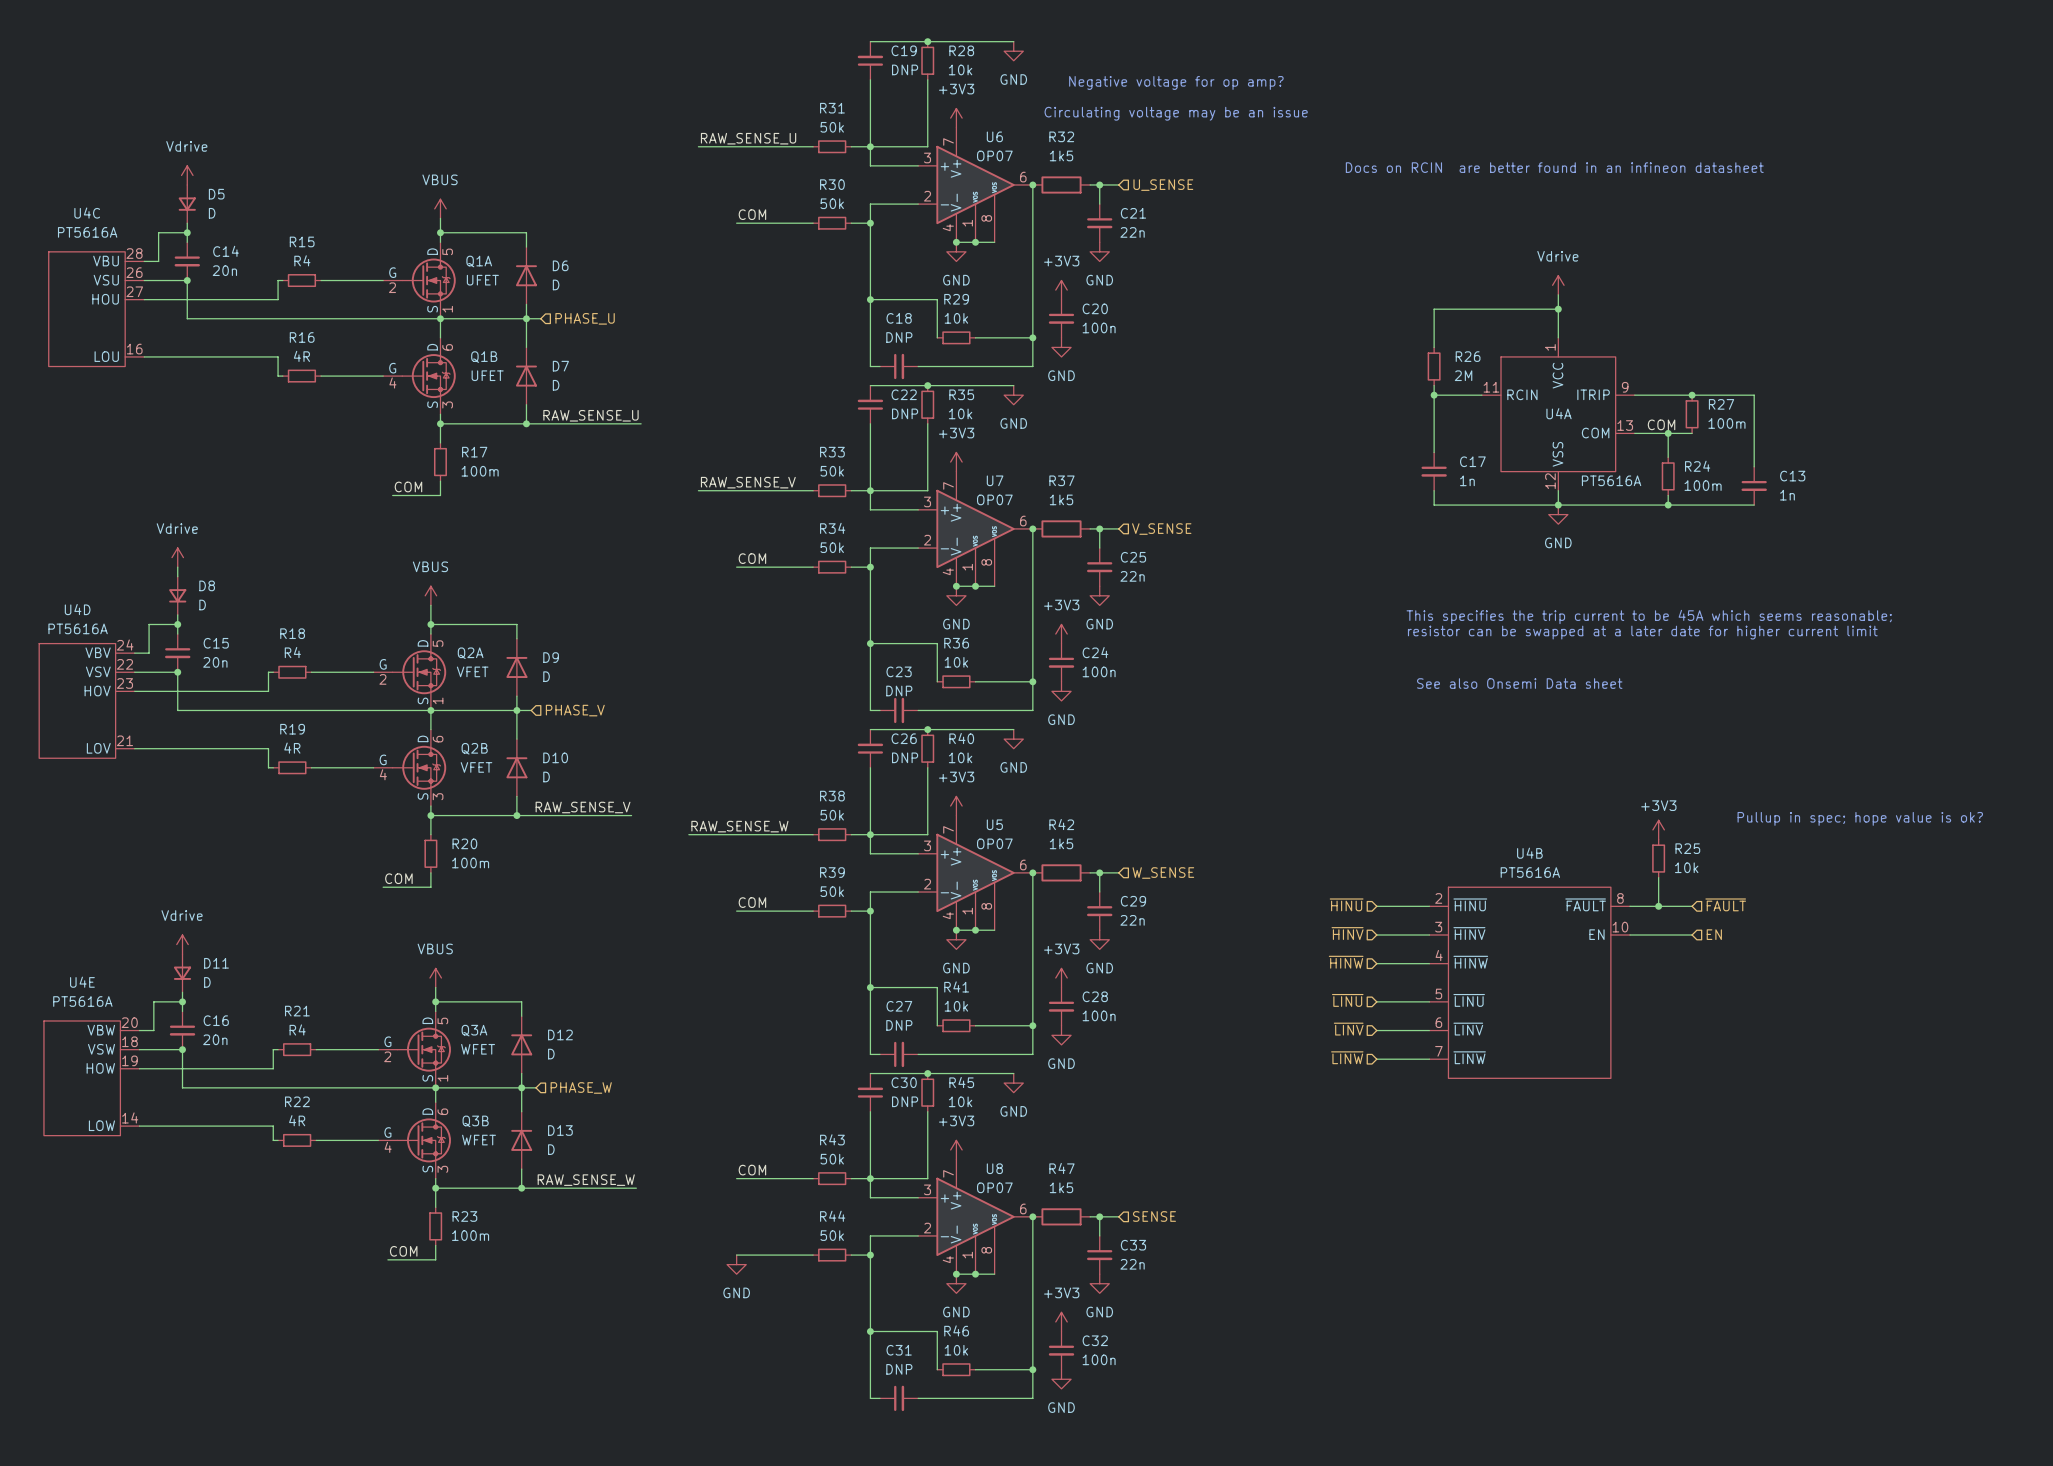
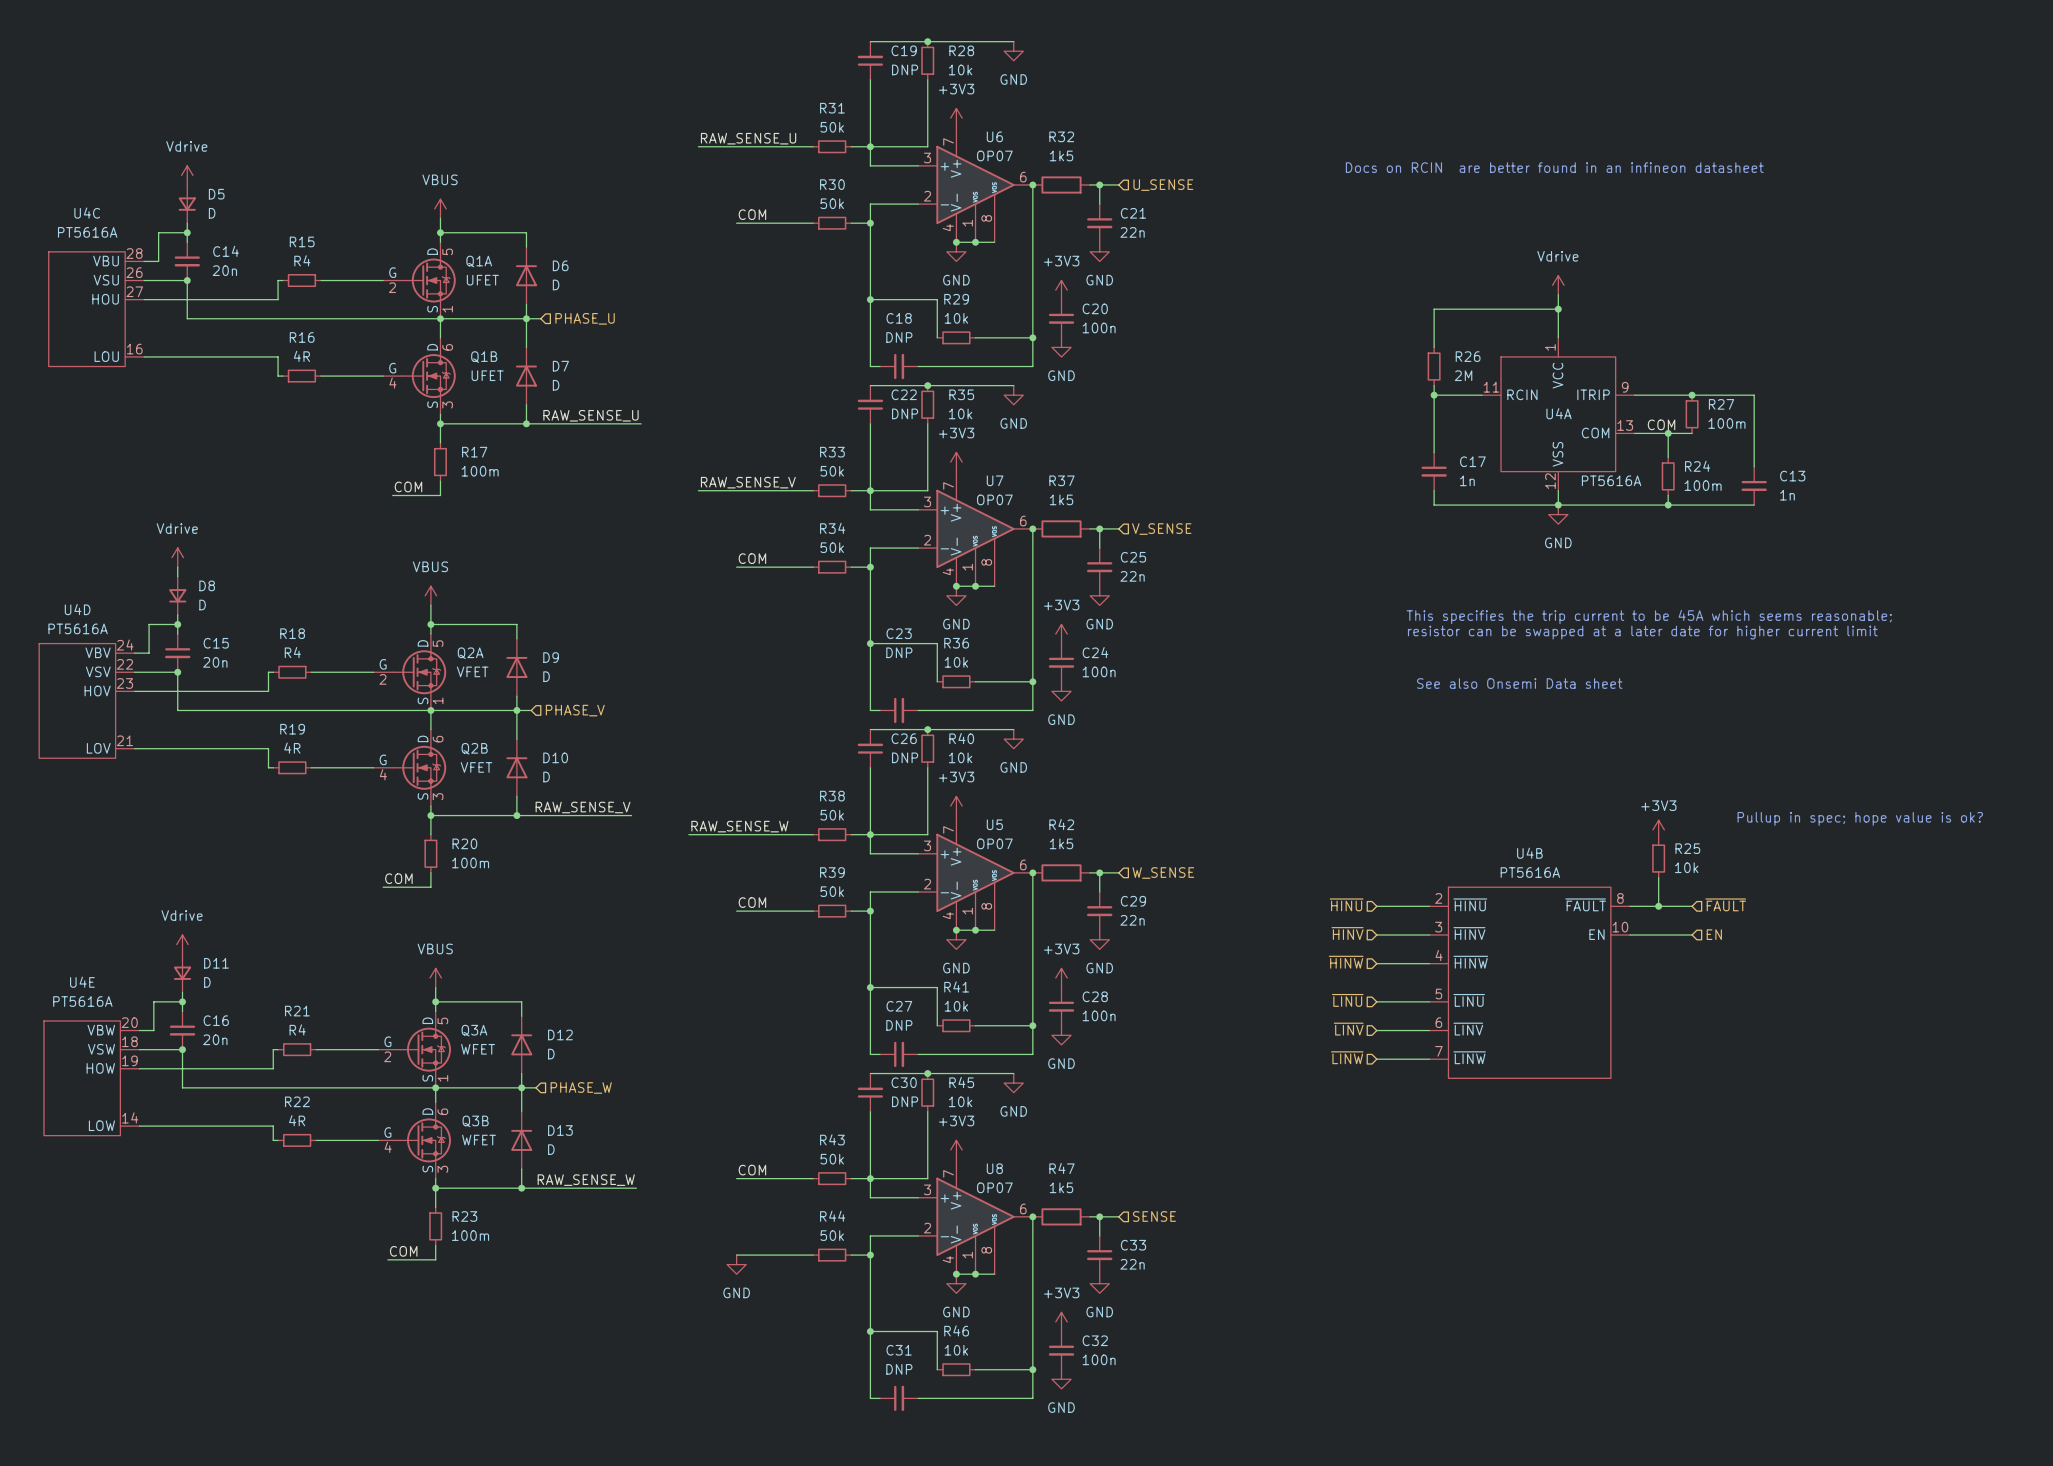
text: Negative voltage for op amp? (1176, 82) -> none
text: Circulating voltage may be an issue (1176, 113) -> none
C23 name position: C23 (899, 671) -> C23 (899, 633)
C23 value position: DNP (899, 691) -> DNP (899, 652)

